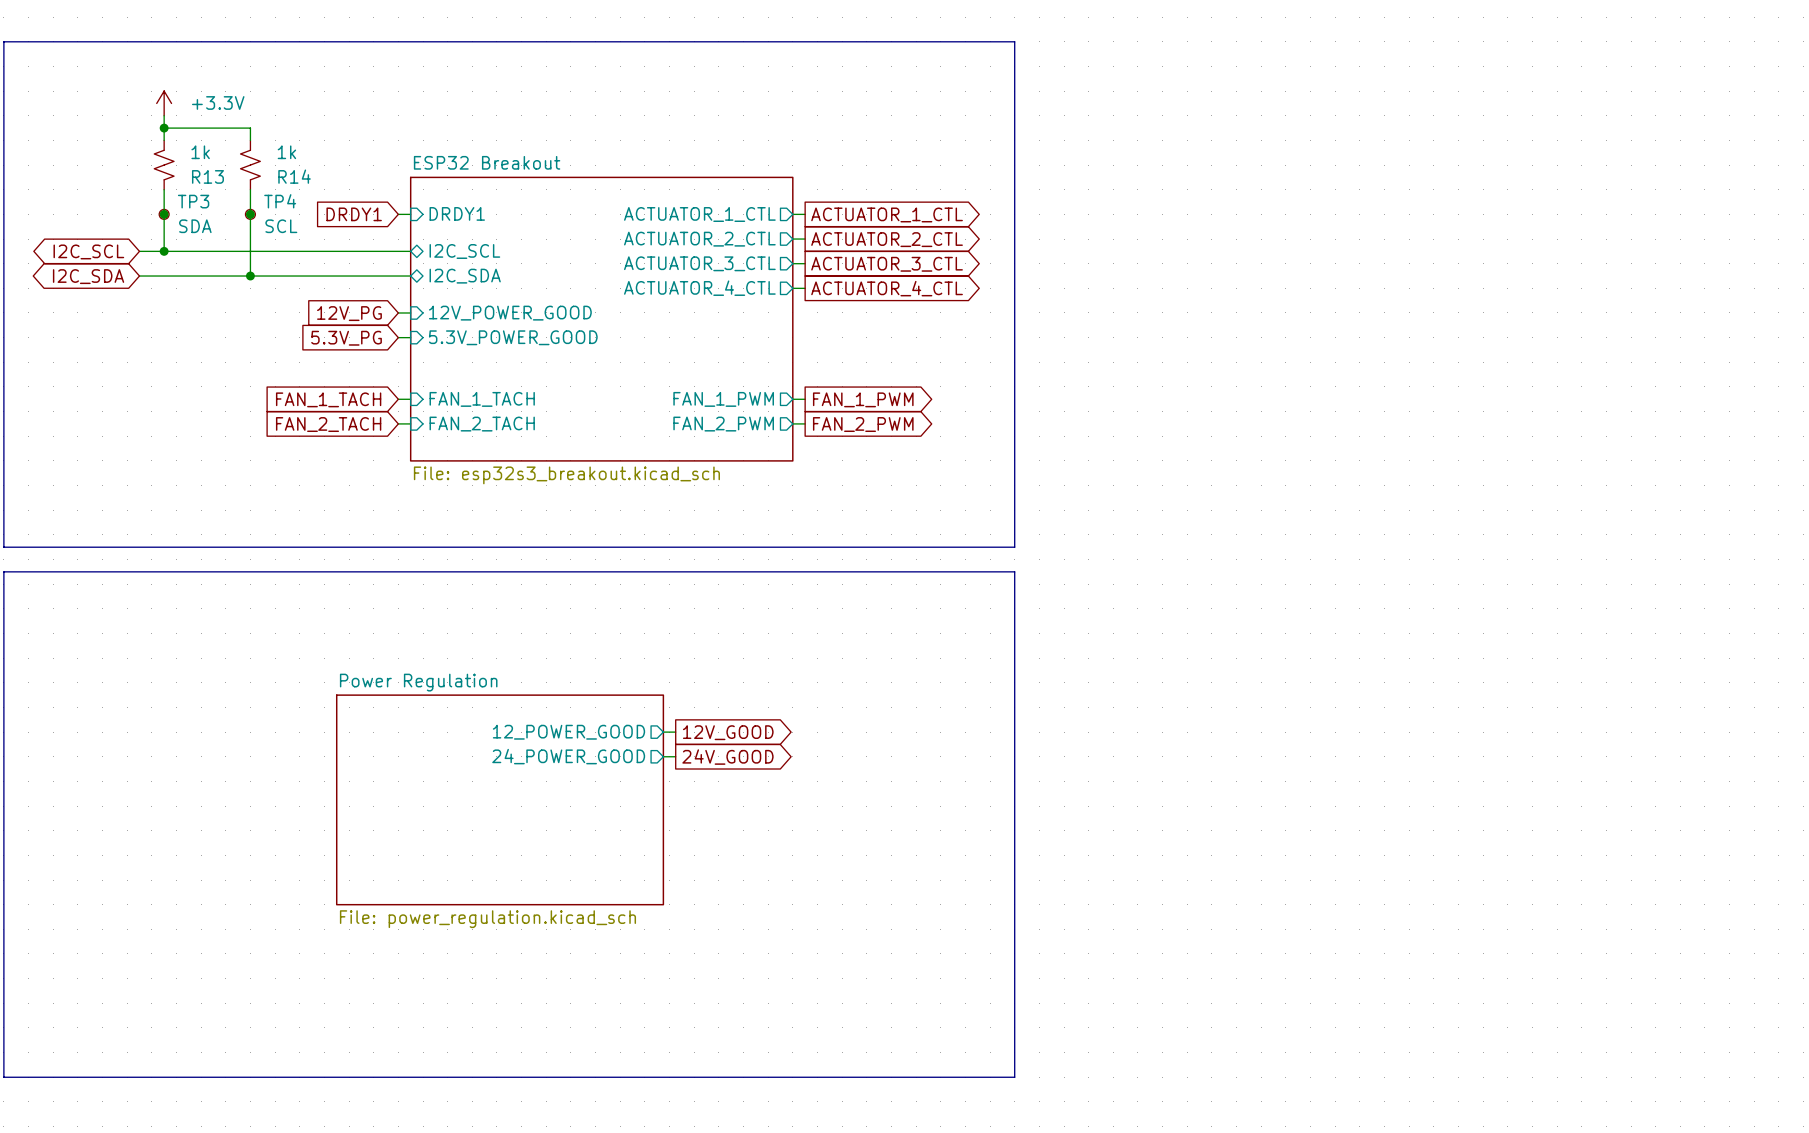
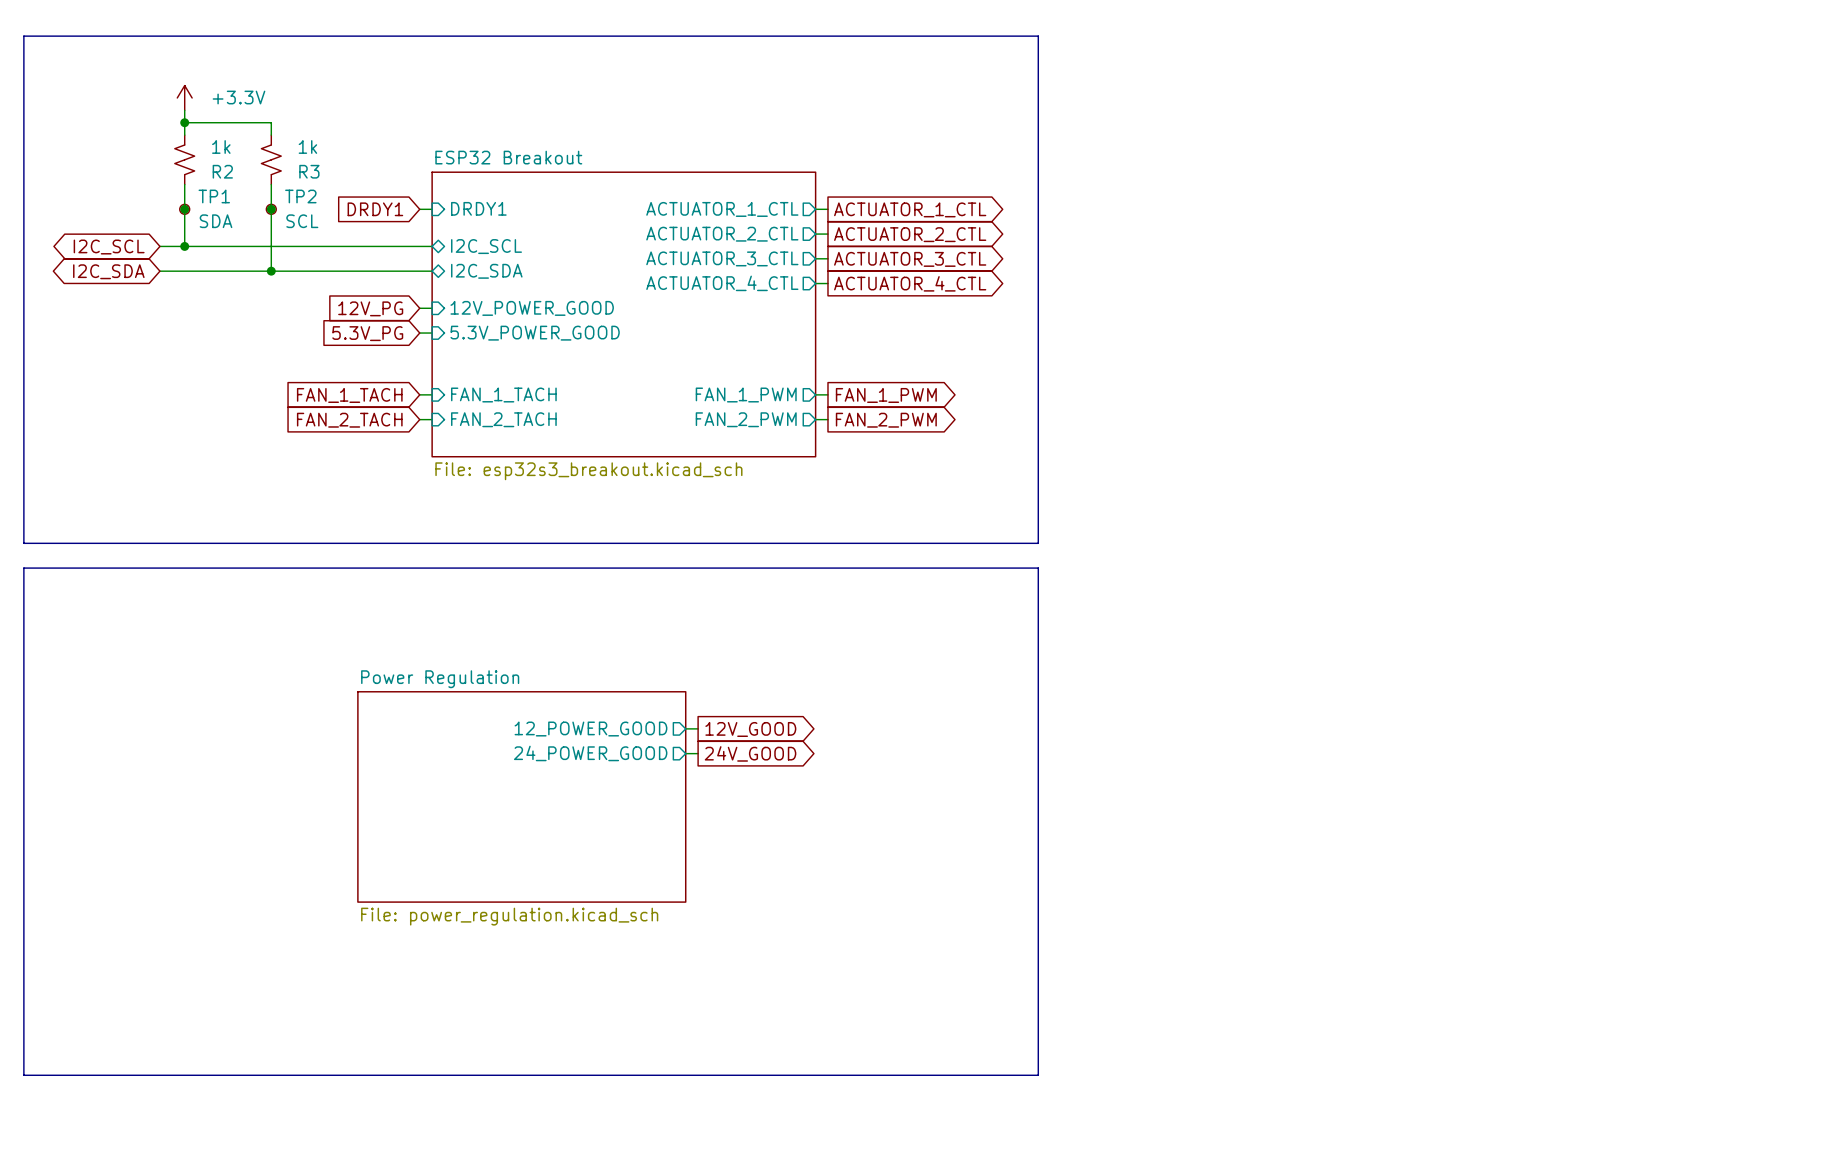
R13 name: R13 (207, 176) -> R2 (222, 171)
R14 name: R14 (294, 176) -> R3 (309, 171)
TP3 name: TP3 (193, 201) -> TP1 (214, 196)
TP4 name: TP4 (280, 201) -> TP2 (300, 196)

